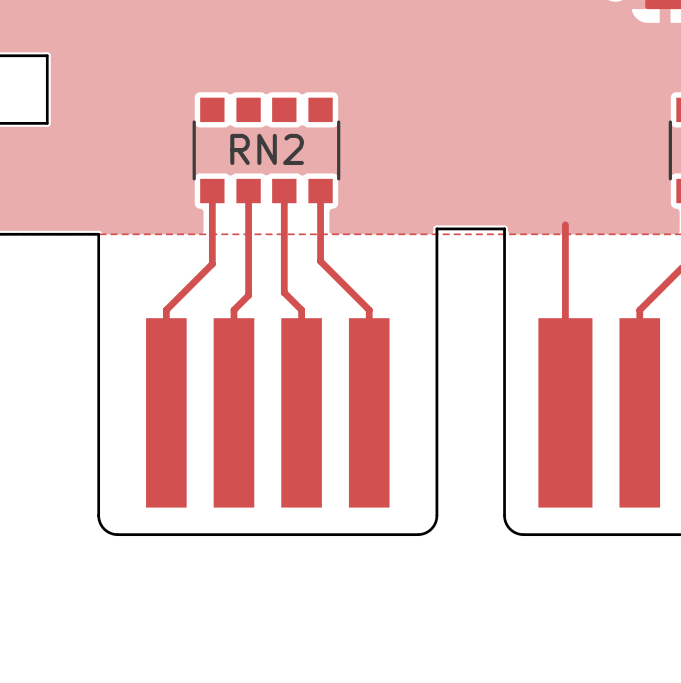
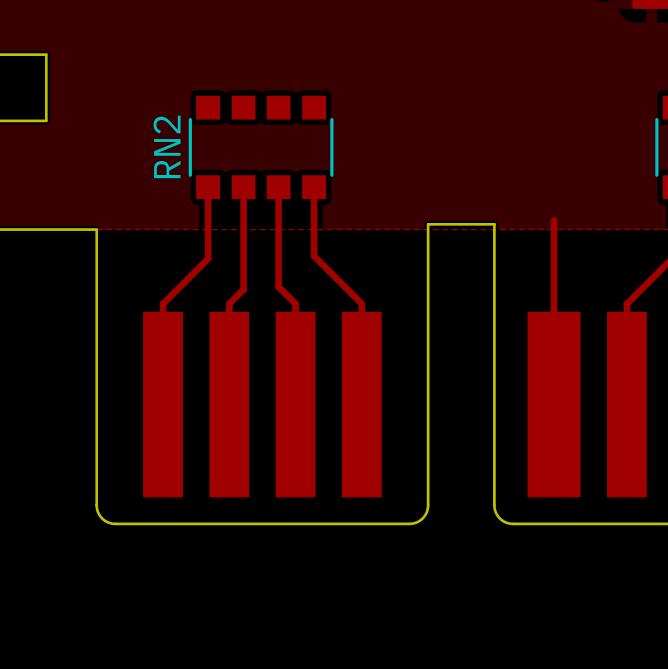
RN2 name rotation: 0° (267, 149) -> 90° counterclockwise (167, 146)

